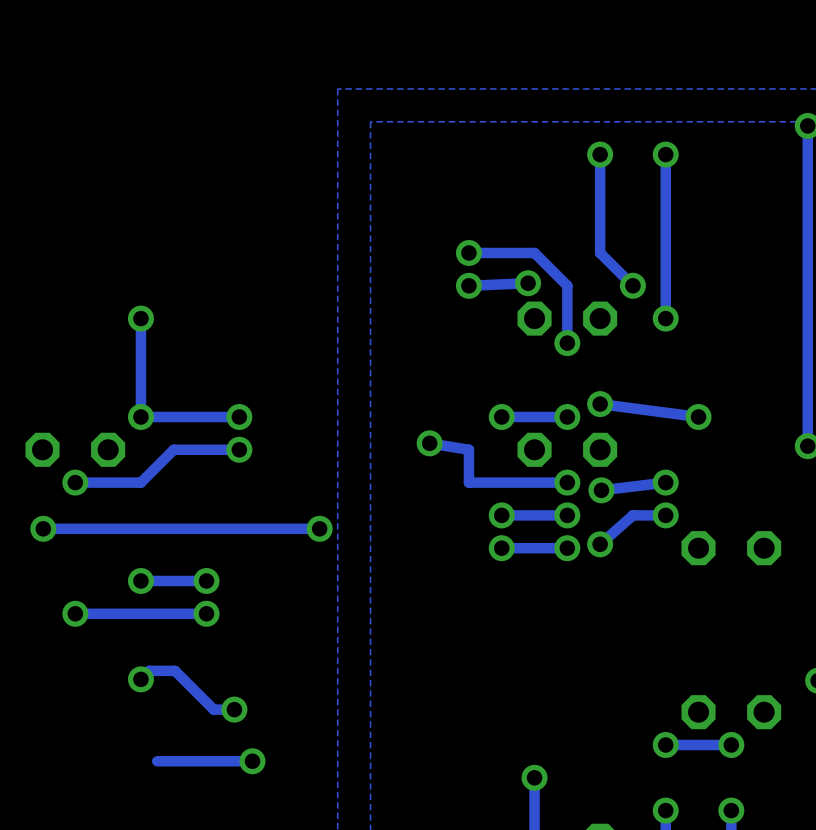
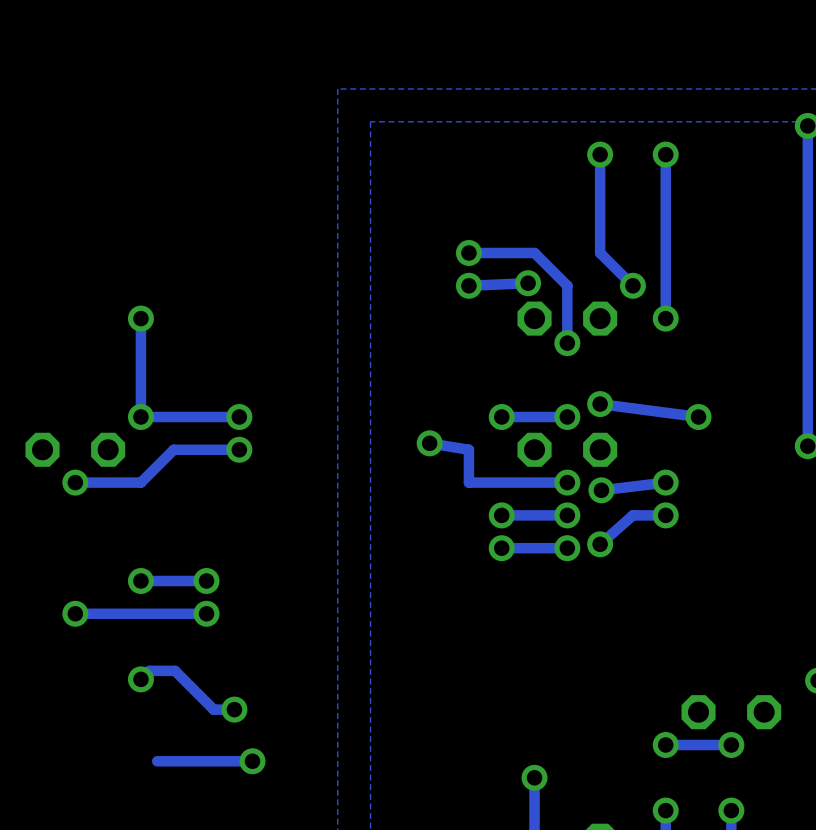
via: (43, 528) -> none
track: (319, 528) (43, 528) -> none
via: (319, 528) -> none
part: (731, 548) -> none

